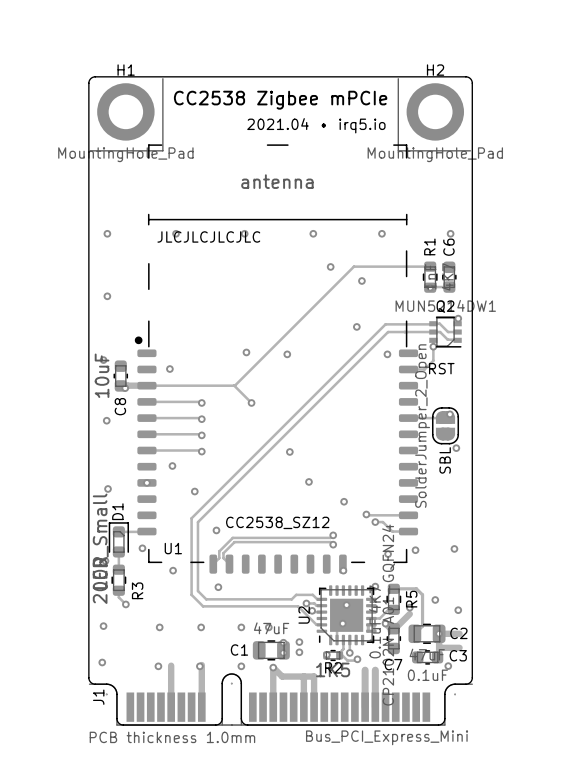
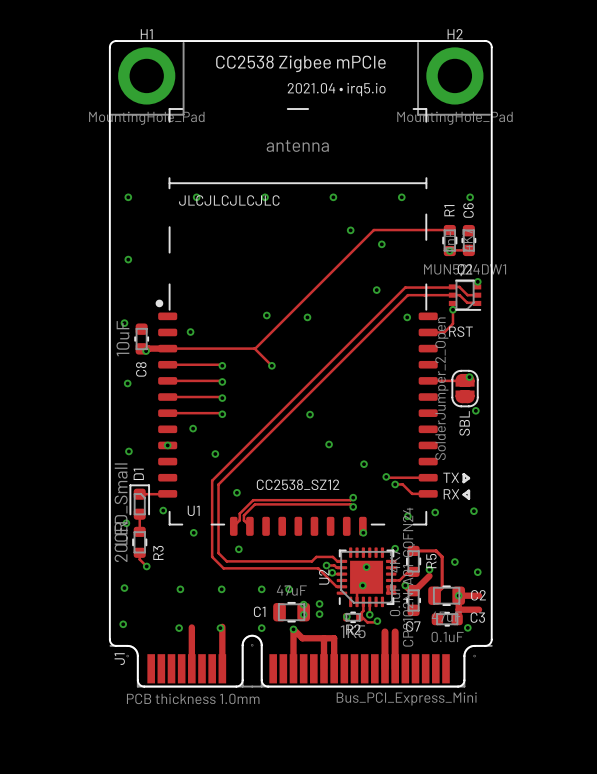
line: none -> (463, 474) (468, 478) (463, 481) (463, 474)
text: none -> TX (451, 477)
line: none -> (468, 490) (468, 498) (463, 494) (468, 490)
text: none -> RX (451, 494)

